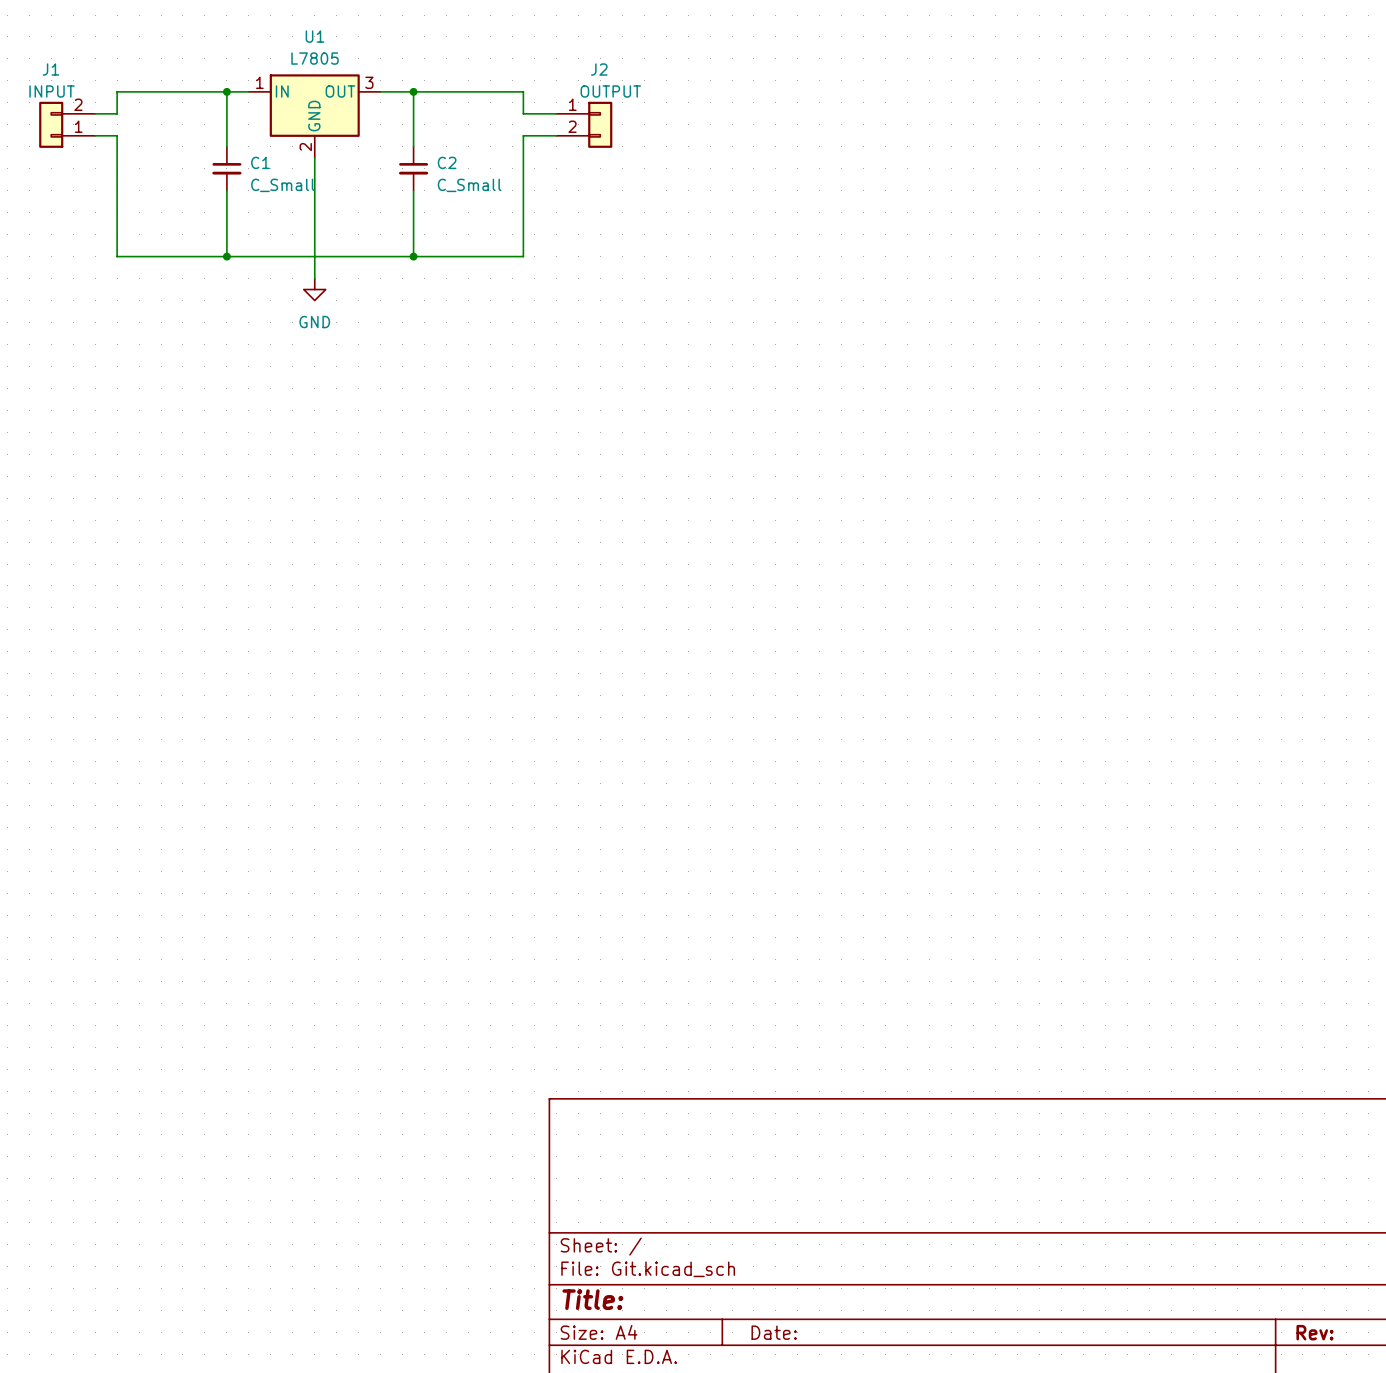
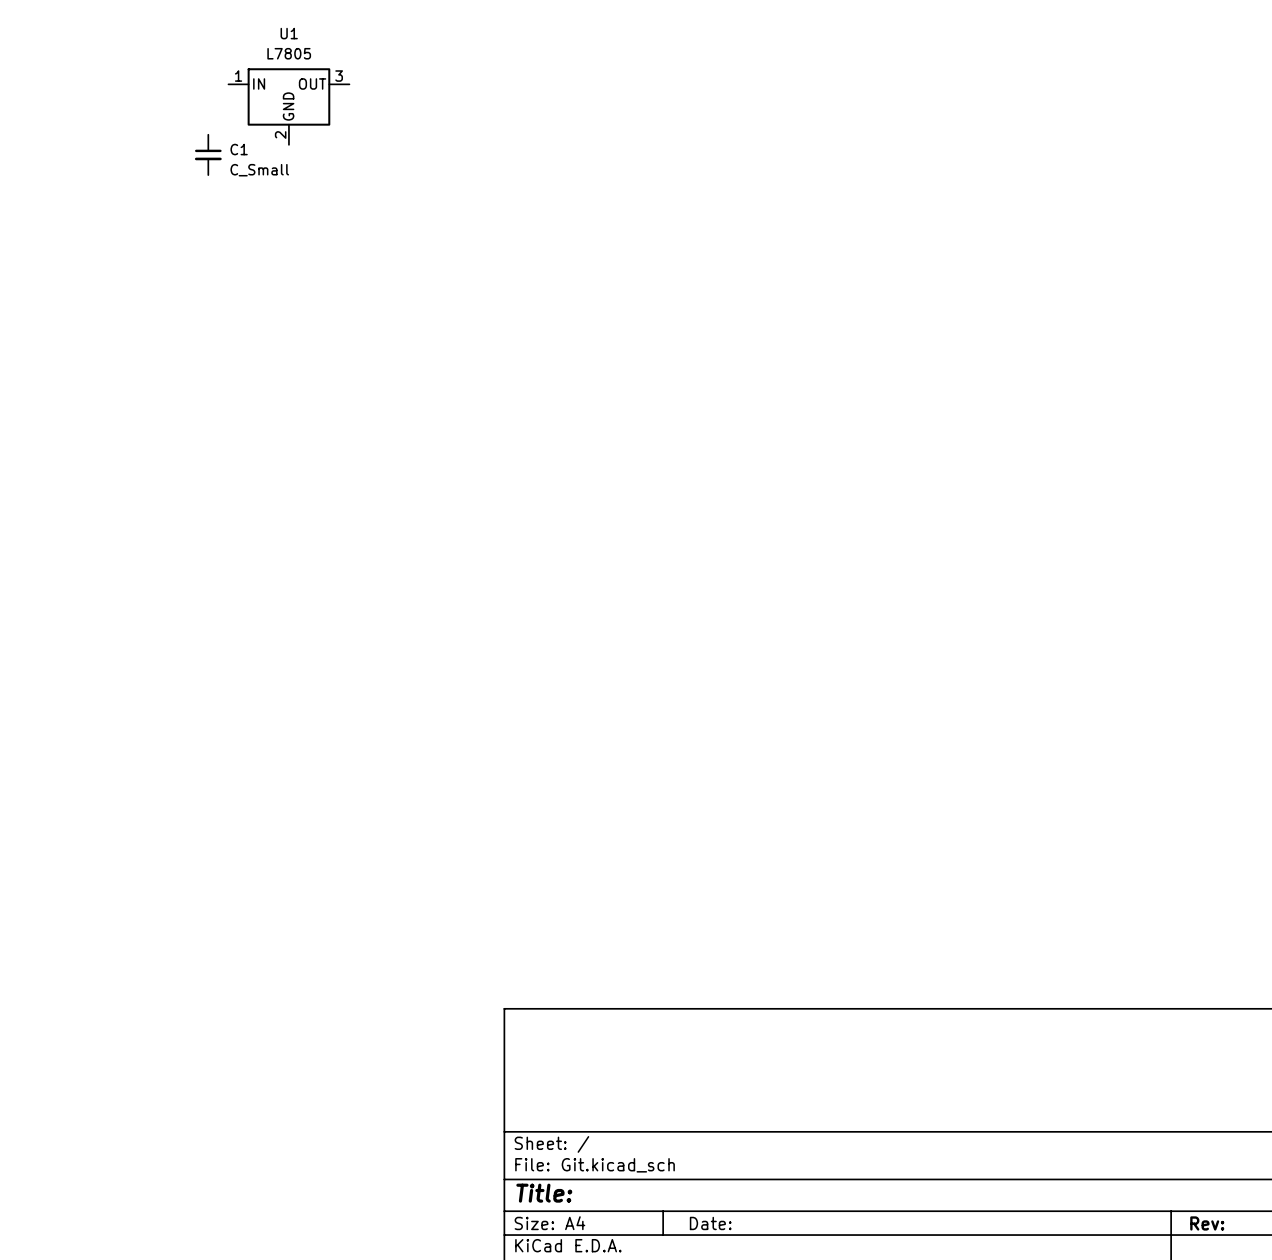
wire: (226, 91) (226, 146) -> none
junction: (226, 91) -> none
wire: (248, 91) (117, 91) (117, 113) (95, 113) -> none
wire: (380, 91) (523, 91) (523, 113) (556, 113) -> none
wire: (413, 91) (413, 146) -> none
junction: (413, 91) -> none
J1: INPUT (67, 124) -> none
J2: OUTPUT (584, 124) -> none
wire: (95, 135) (117, 135) (117, 256) (523, 256) (523, 135) (556, 135) -> none
wire: (314, 157) (314, 278) -> none
C2: C_Small (413, 168) -> none
wire: (226, 190) (226, 256) -> none
wire: (413, 190) (413, 256) -> none
junction: (226, 256) -> none
junction: (413, 256) -> none
power symbol: GND (314, 289) -> none

